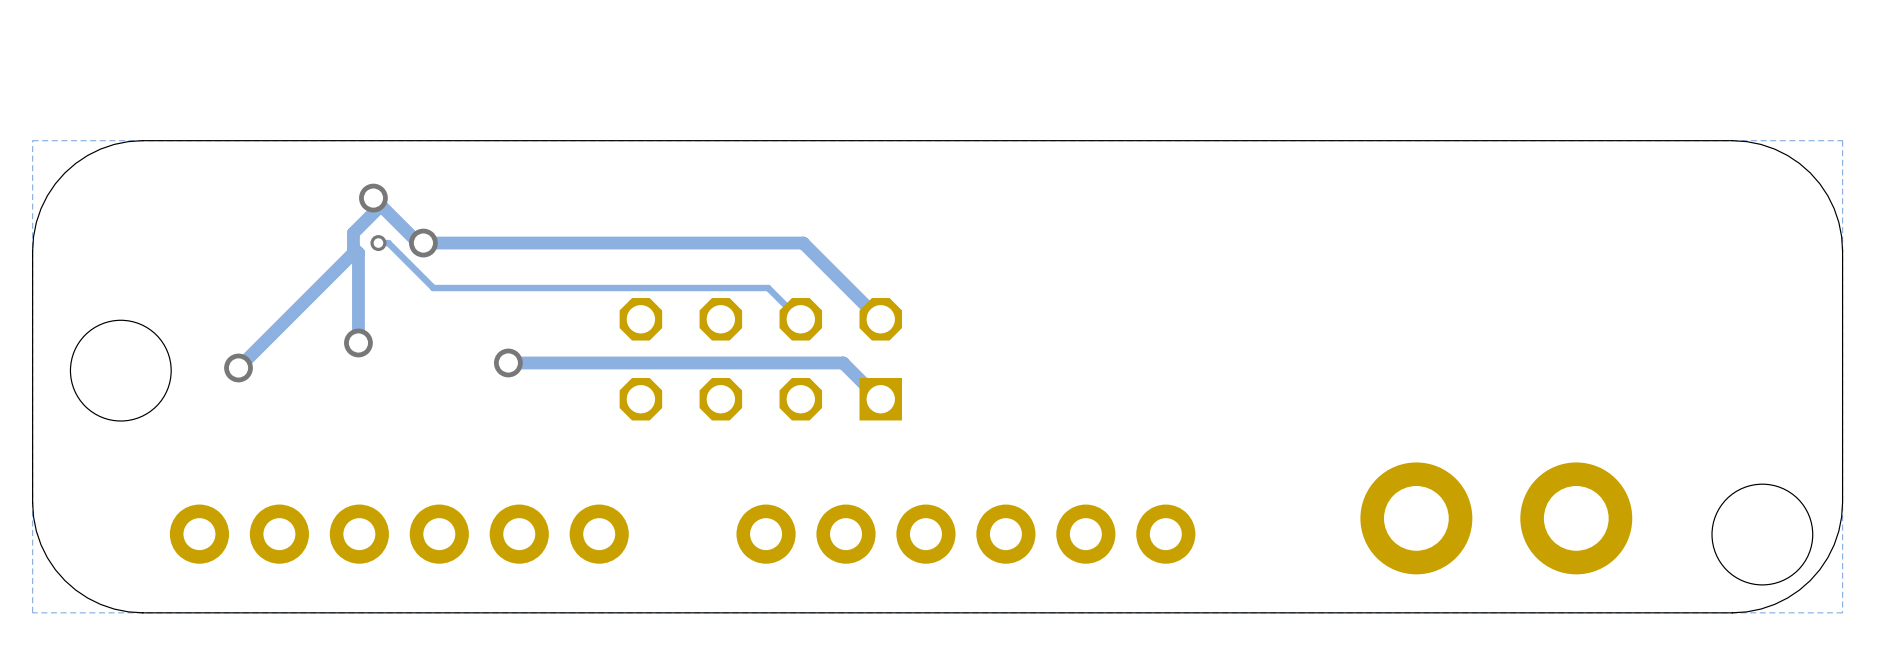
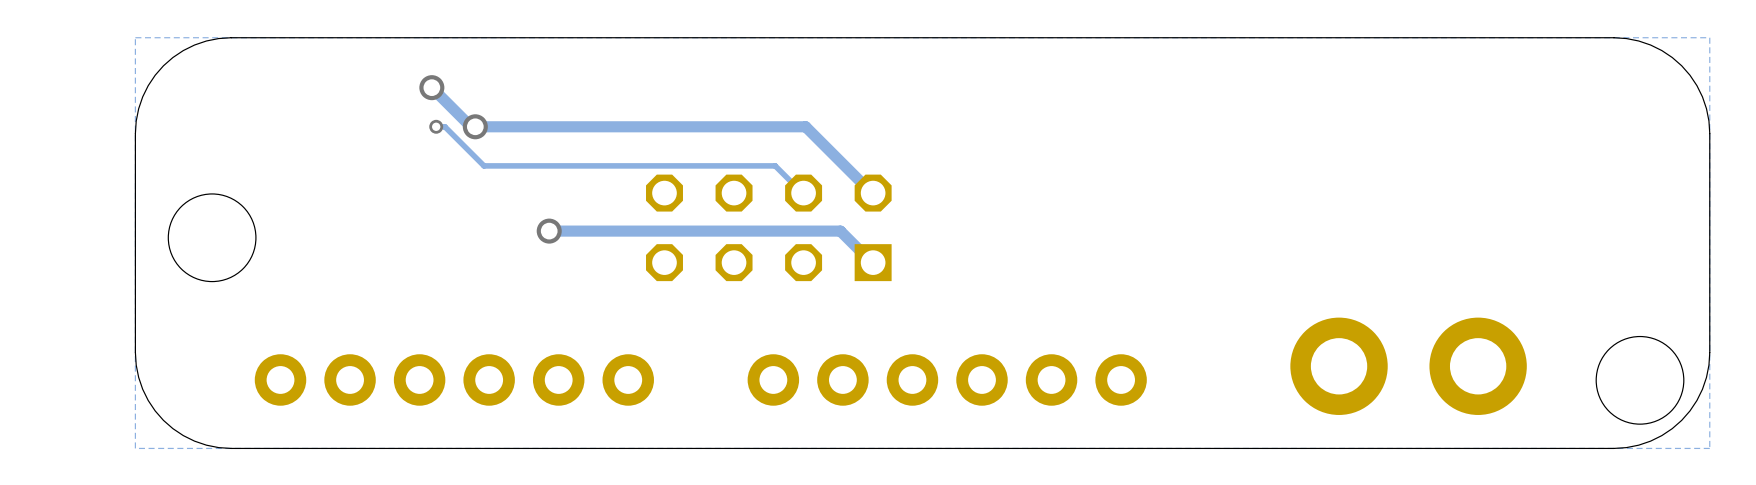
track: (373, 198) (378, 208) (353, 233) (353, 248) (358, 253) -> none
track: (358, 253) (358, 342) -> none
track: (358, 253) (353, 253) (238, 367) -> none
via: (358, 342) -> none
via: (238, 367) -> none

